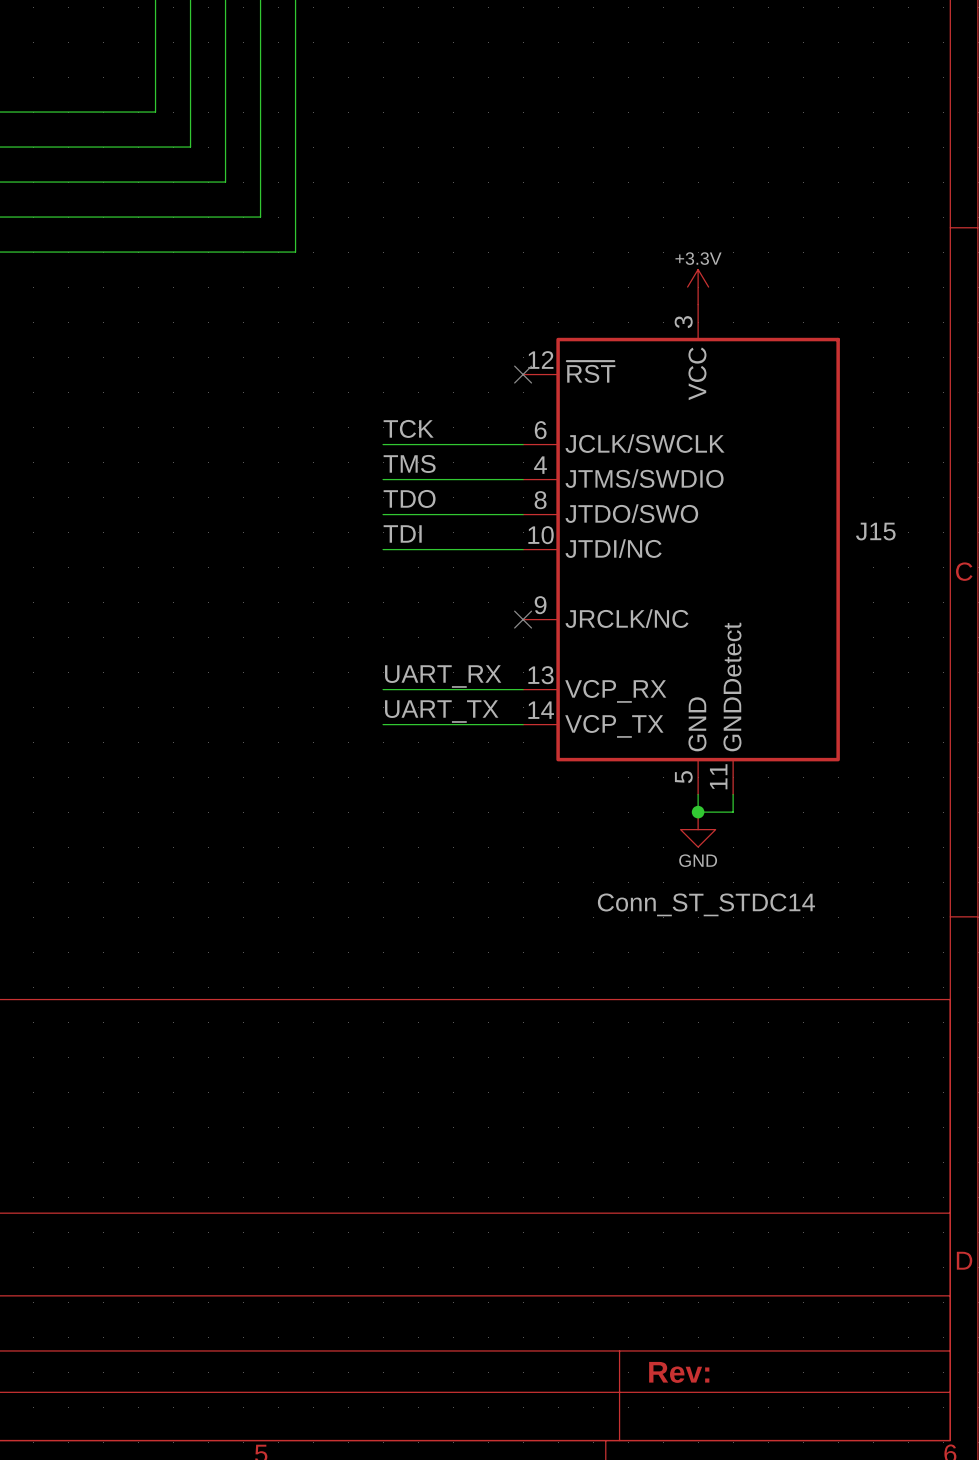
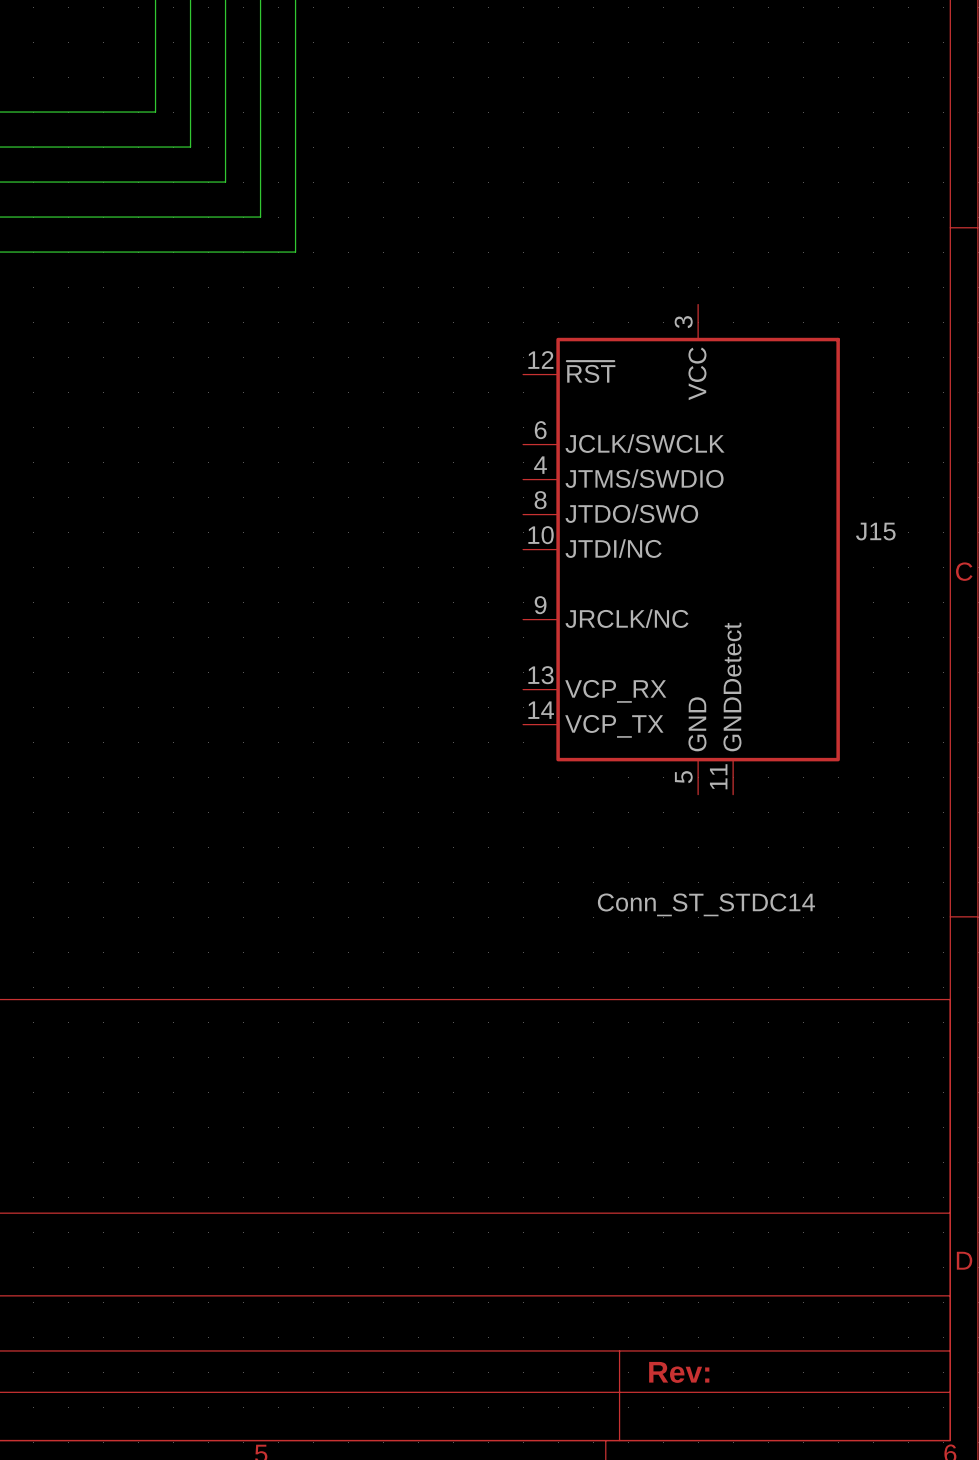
power symbol: +3.3V (698, 287) -> none
no-connect mark: (523, 374) -> none
label: TCK (408, 428) -> none
wire: (383, 444) (523, 444) -> none
label: TMS (409, 463) -> none
wire: (383, 479) (523, 479) -> none
label: TDO (409, 498) -> none
wire: (383, 514) (523, 514) -> none
label: TDI (402, 533) -> none
wire: (383, 549) (523, 549) -> none
no-connect mark: (523, 619) -> none
label: UART_RX (443, 676) -> none
wire: (383, 689) (523, 689) -> none
label: UART_TX (441, 711) -> none
wire: (383, 724) (523, 724) -> none
wire: (698, 794) (698, 812) (733, 812) (733, 794) -> none
junction: (698, 812) -> none
power symbol: GND (698, 829) -> none

